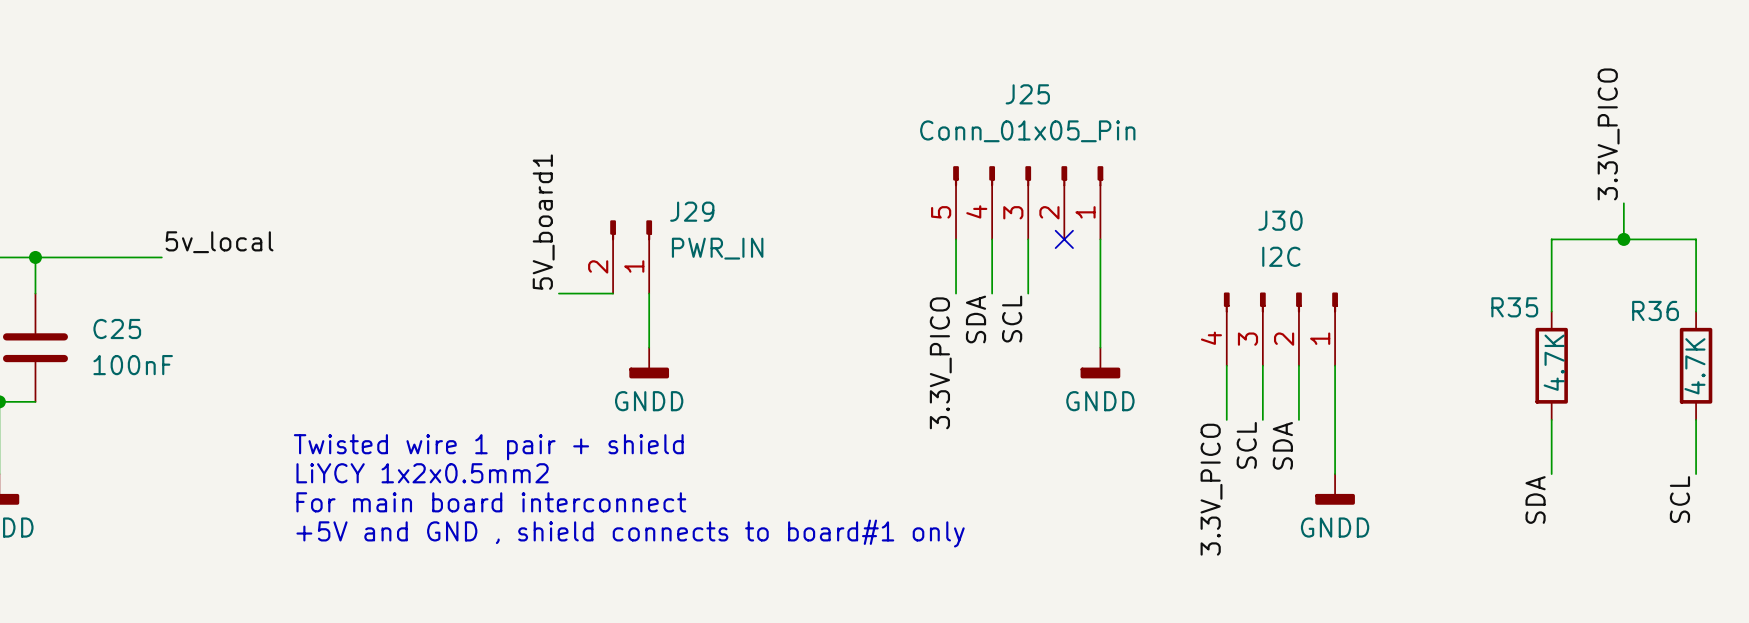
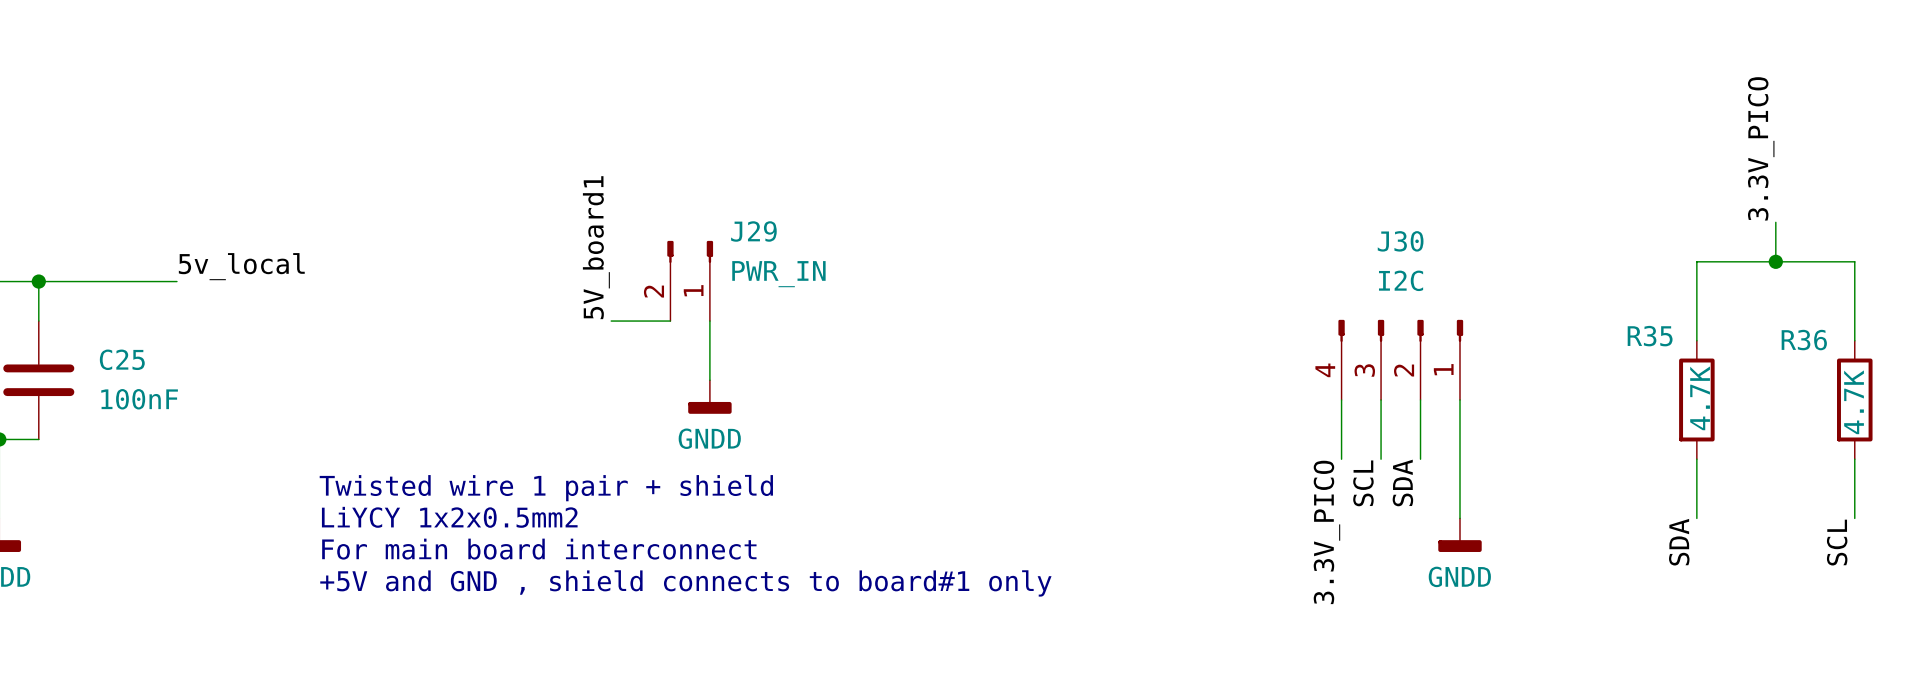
J25: Conn_01x05_Pin (1028, 202) -> none
wire: (956, 239) (956, 293) -> none
wire: (992, 239) (992, 293) -> none
wire: (1028, 239) (1028, 293) -> none
no-connect mark: (1064, 239) -> none
wire: (1100, 239) (1100, 347) -> none
label: SDA (976, 319) -> none
label: SCL (1012, 319) -> none
label: 3.3V_PICO (940, 363) -> none
power symbol: GNDD (1100, 363) -> none

